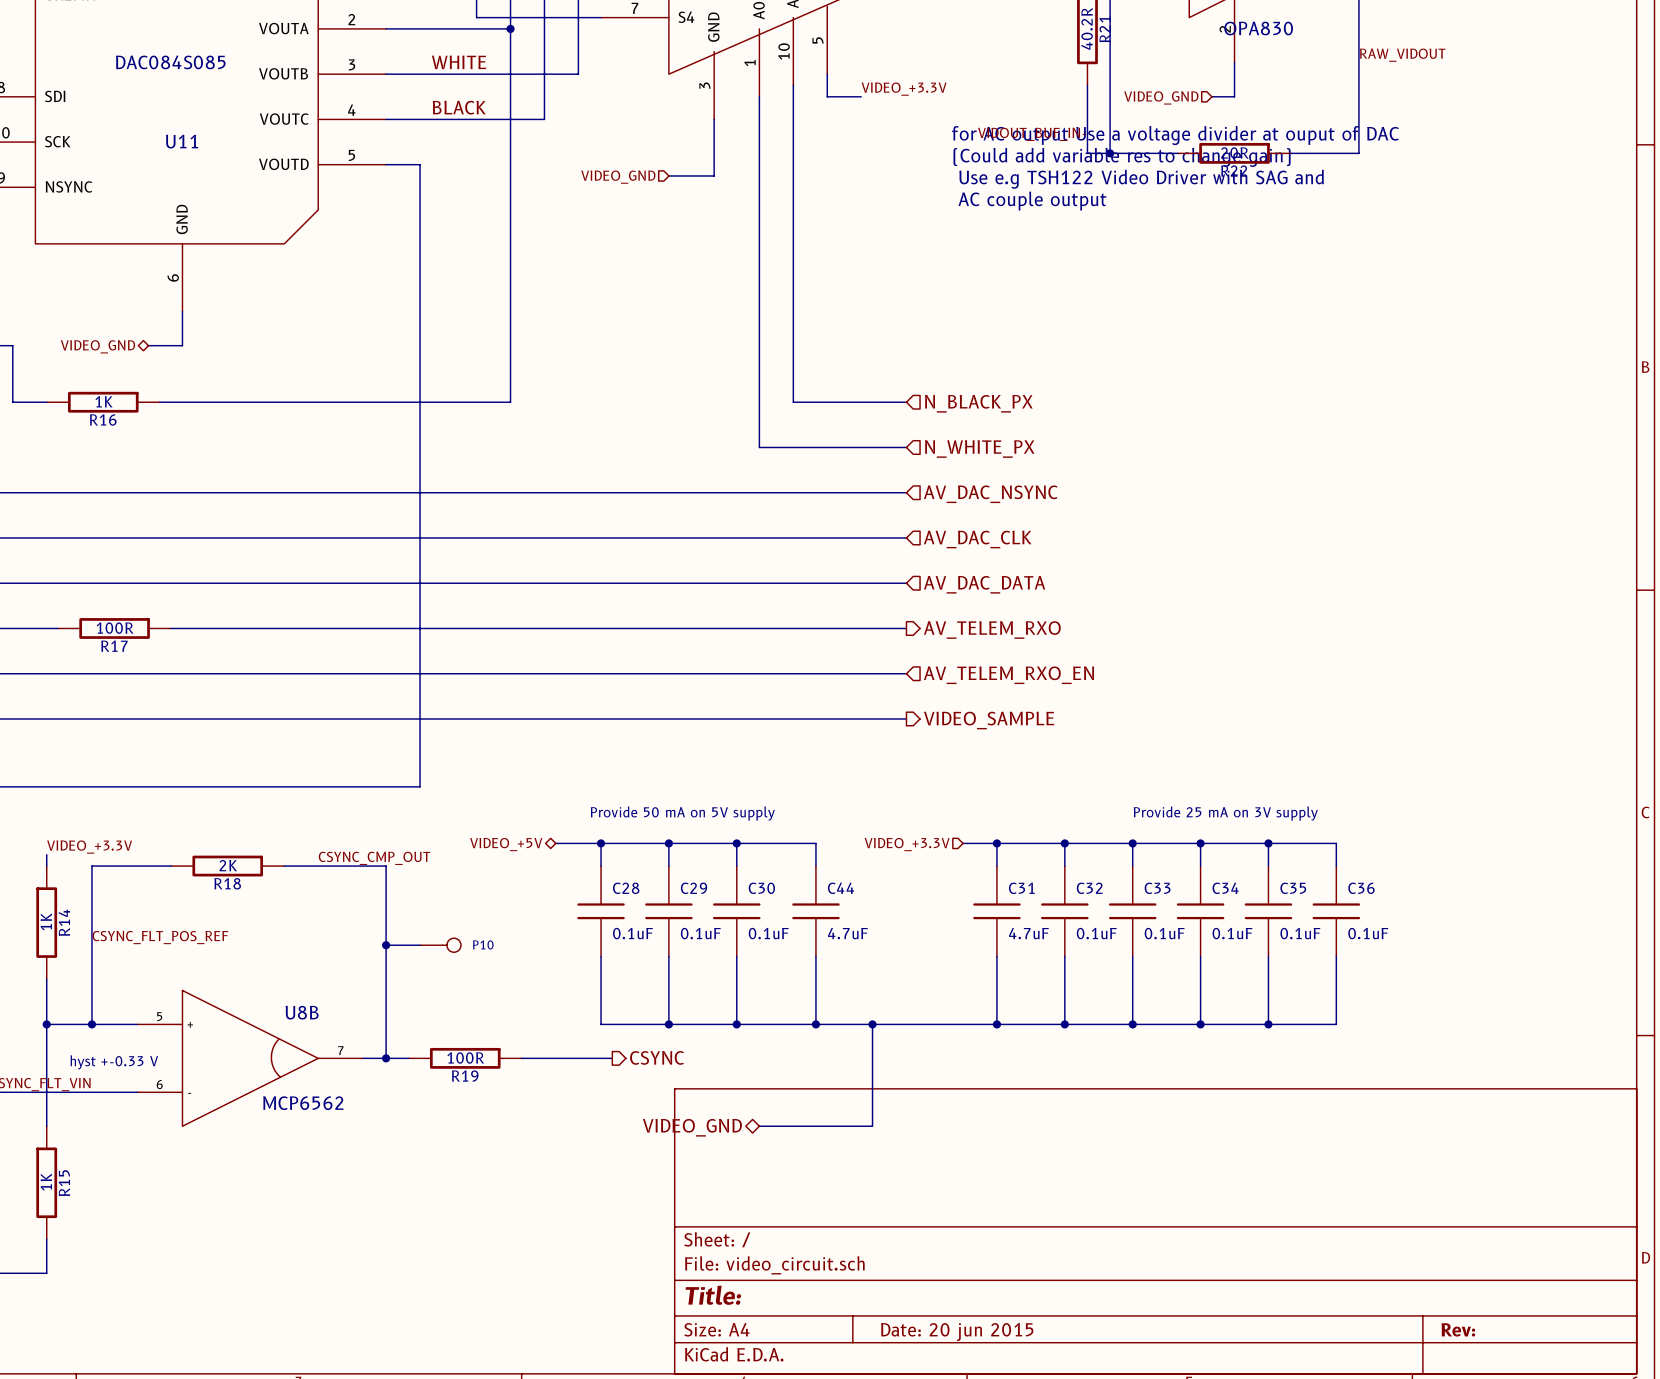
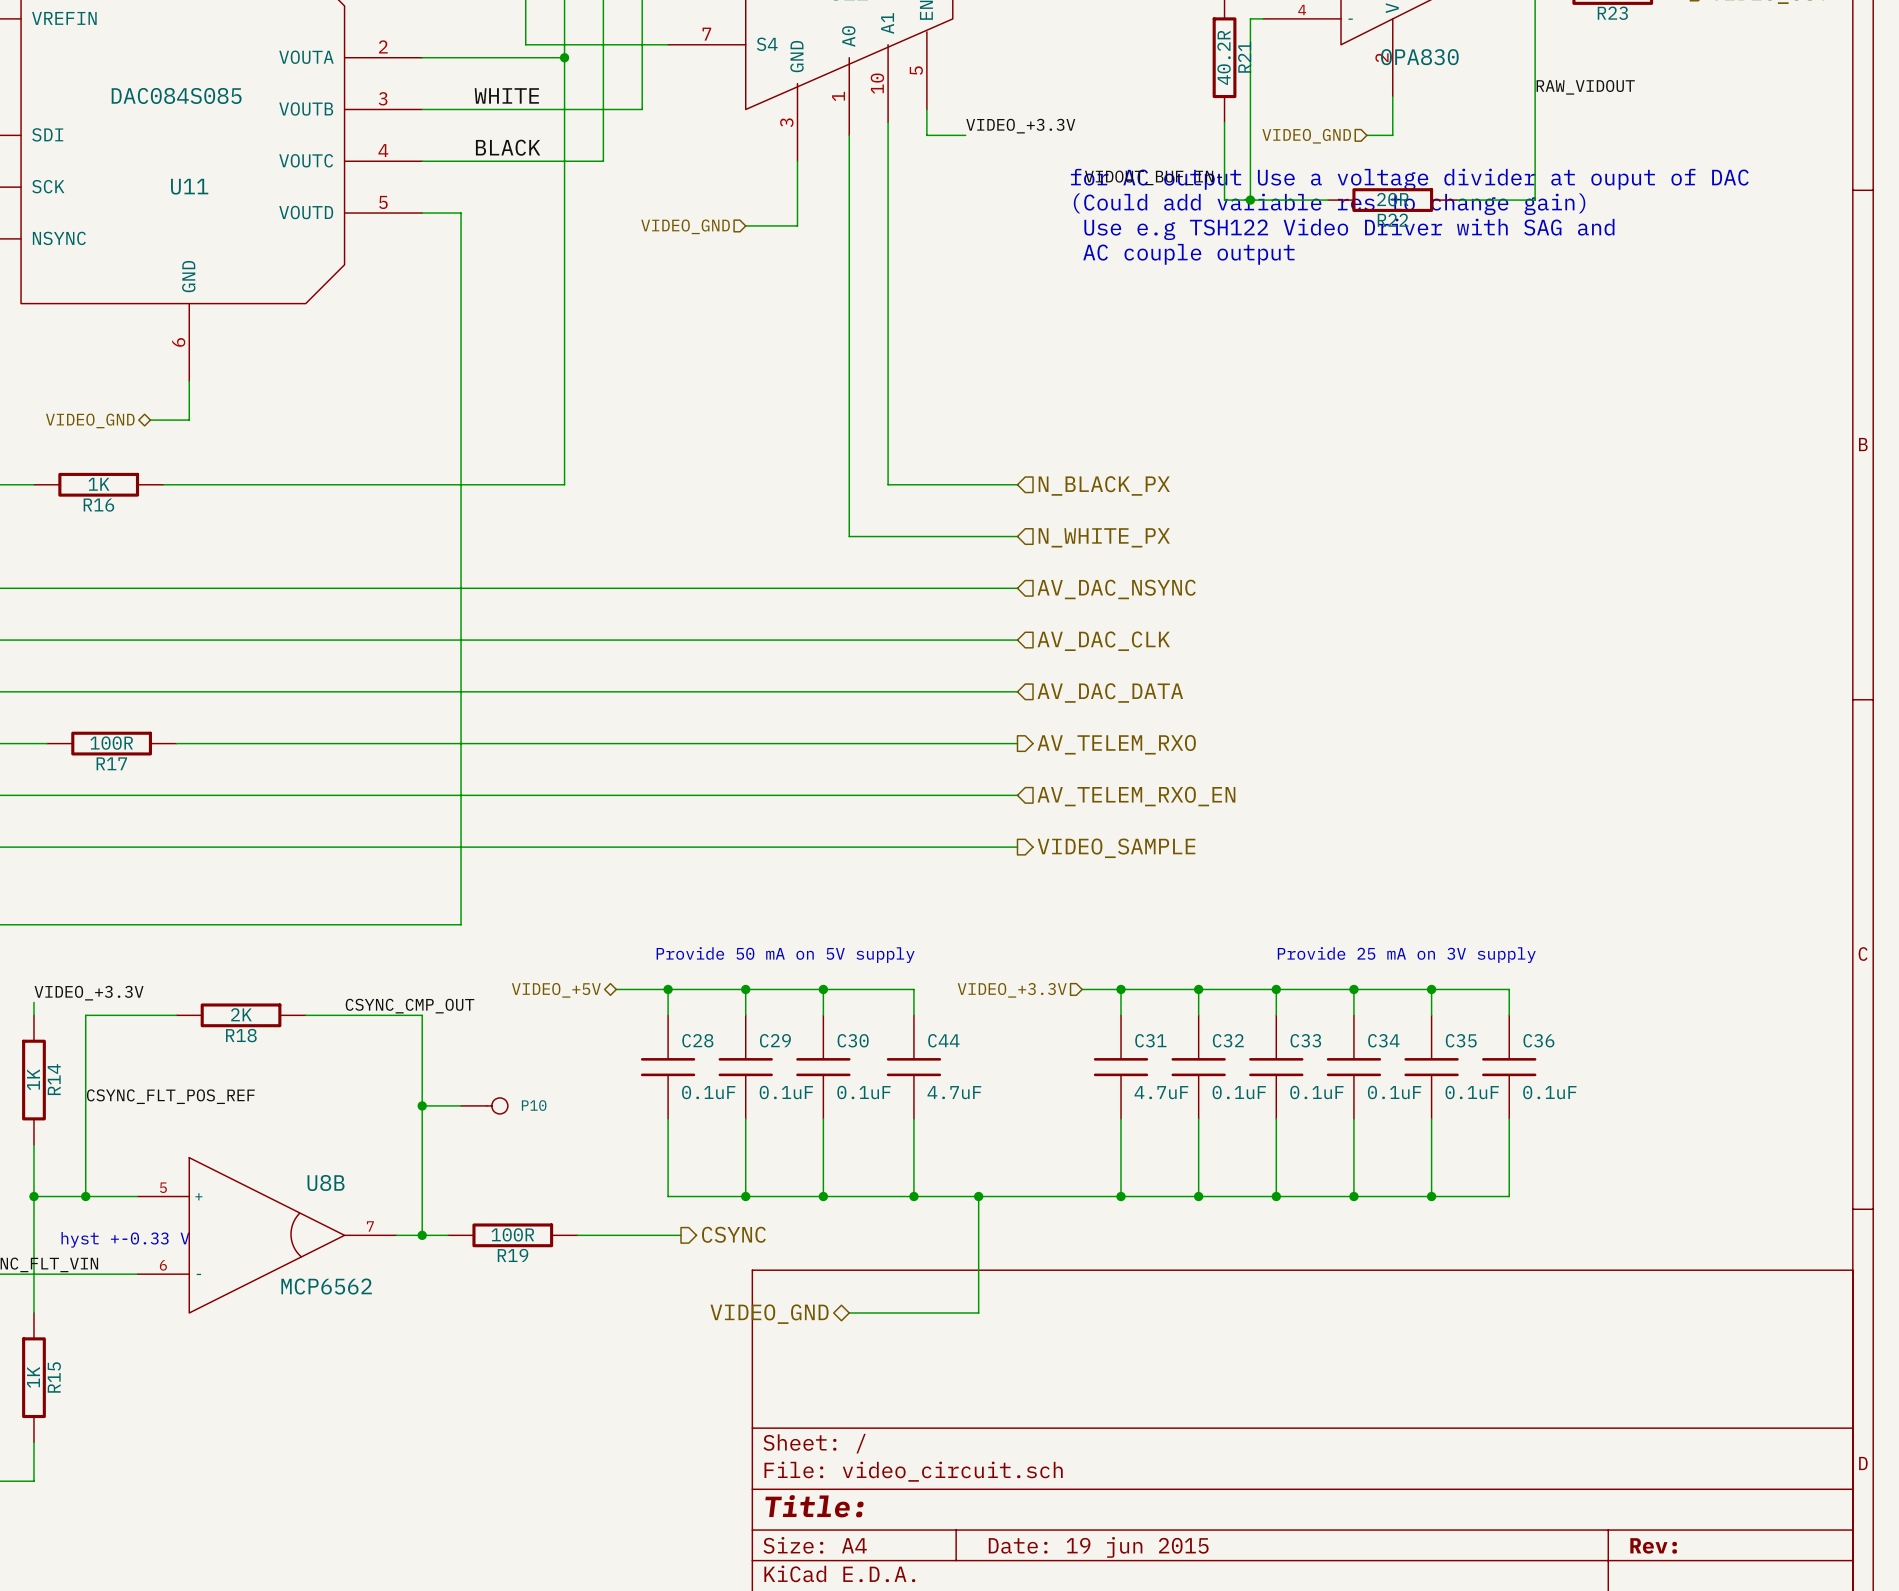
title block: Date: 20 jun 2015 (957, 1332) -> Date: 19 jun 2015 (1098, 1547)

